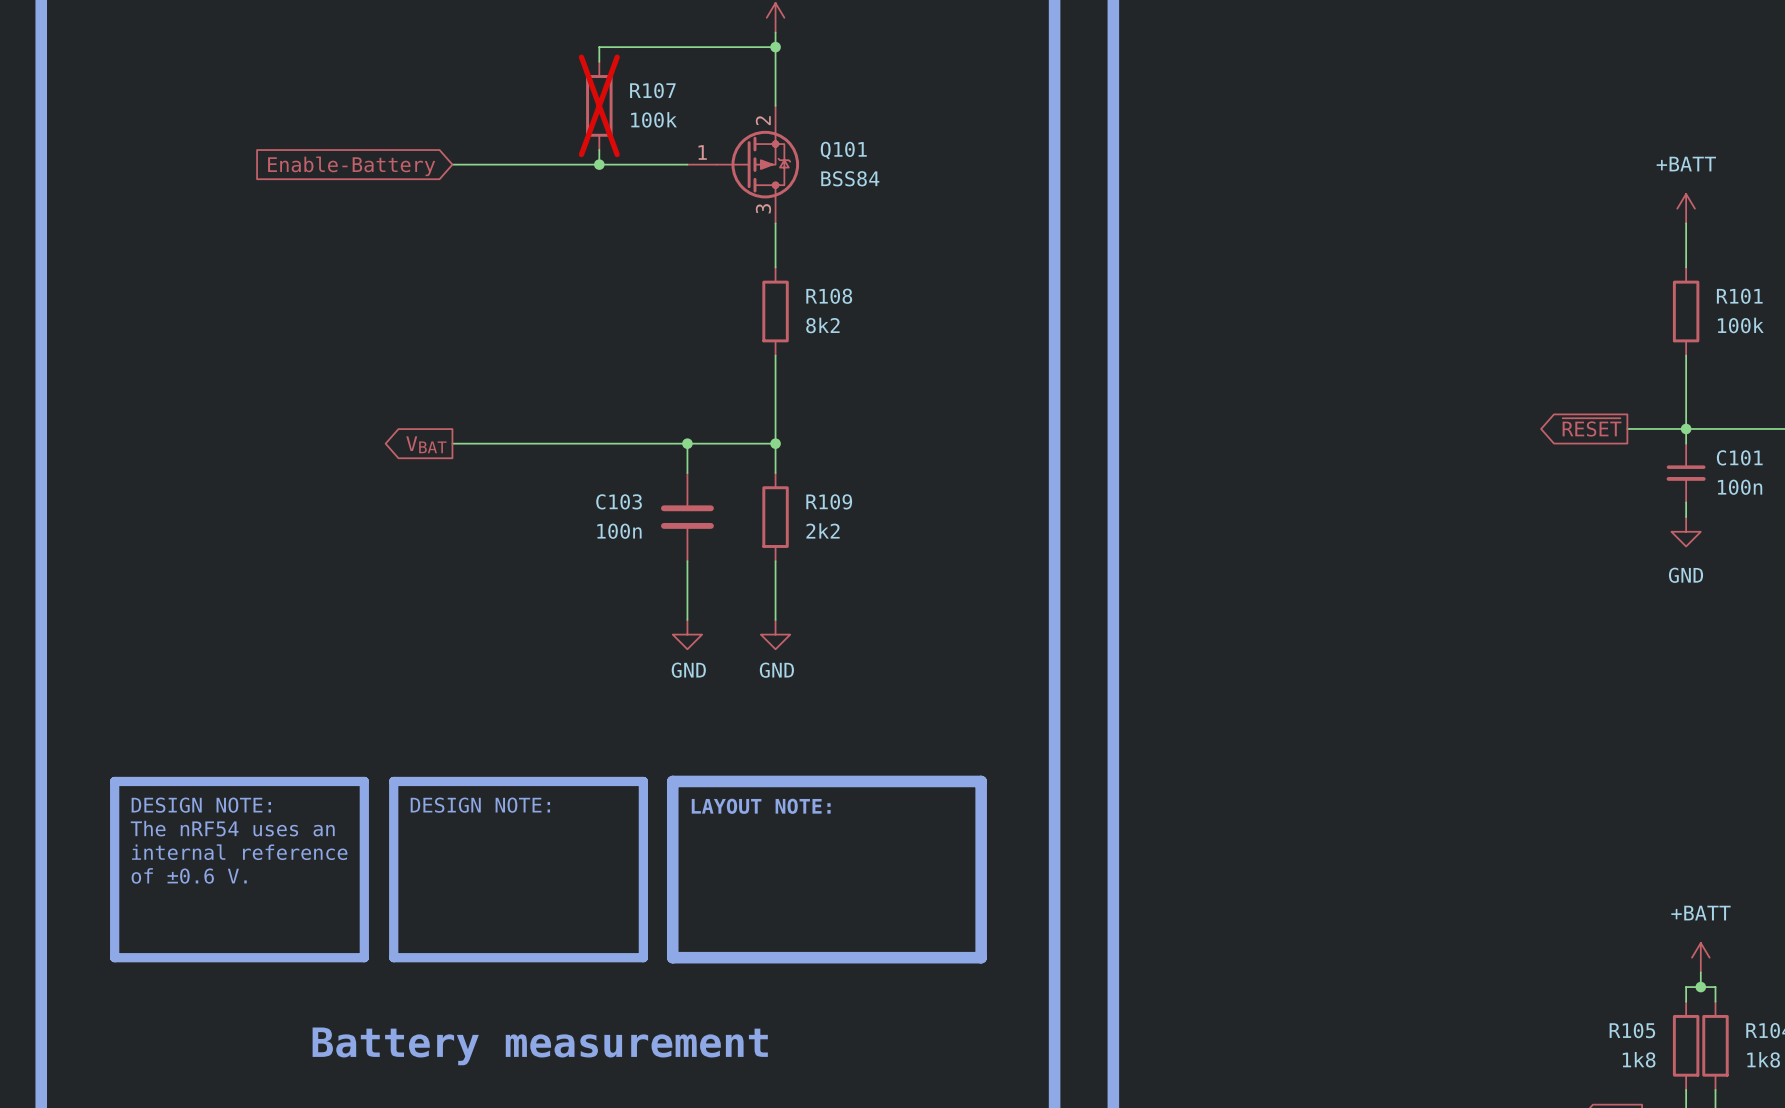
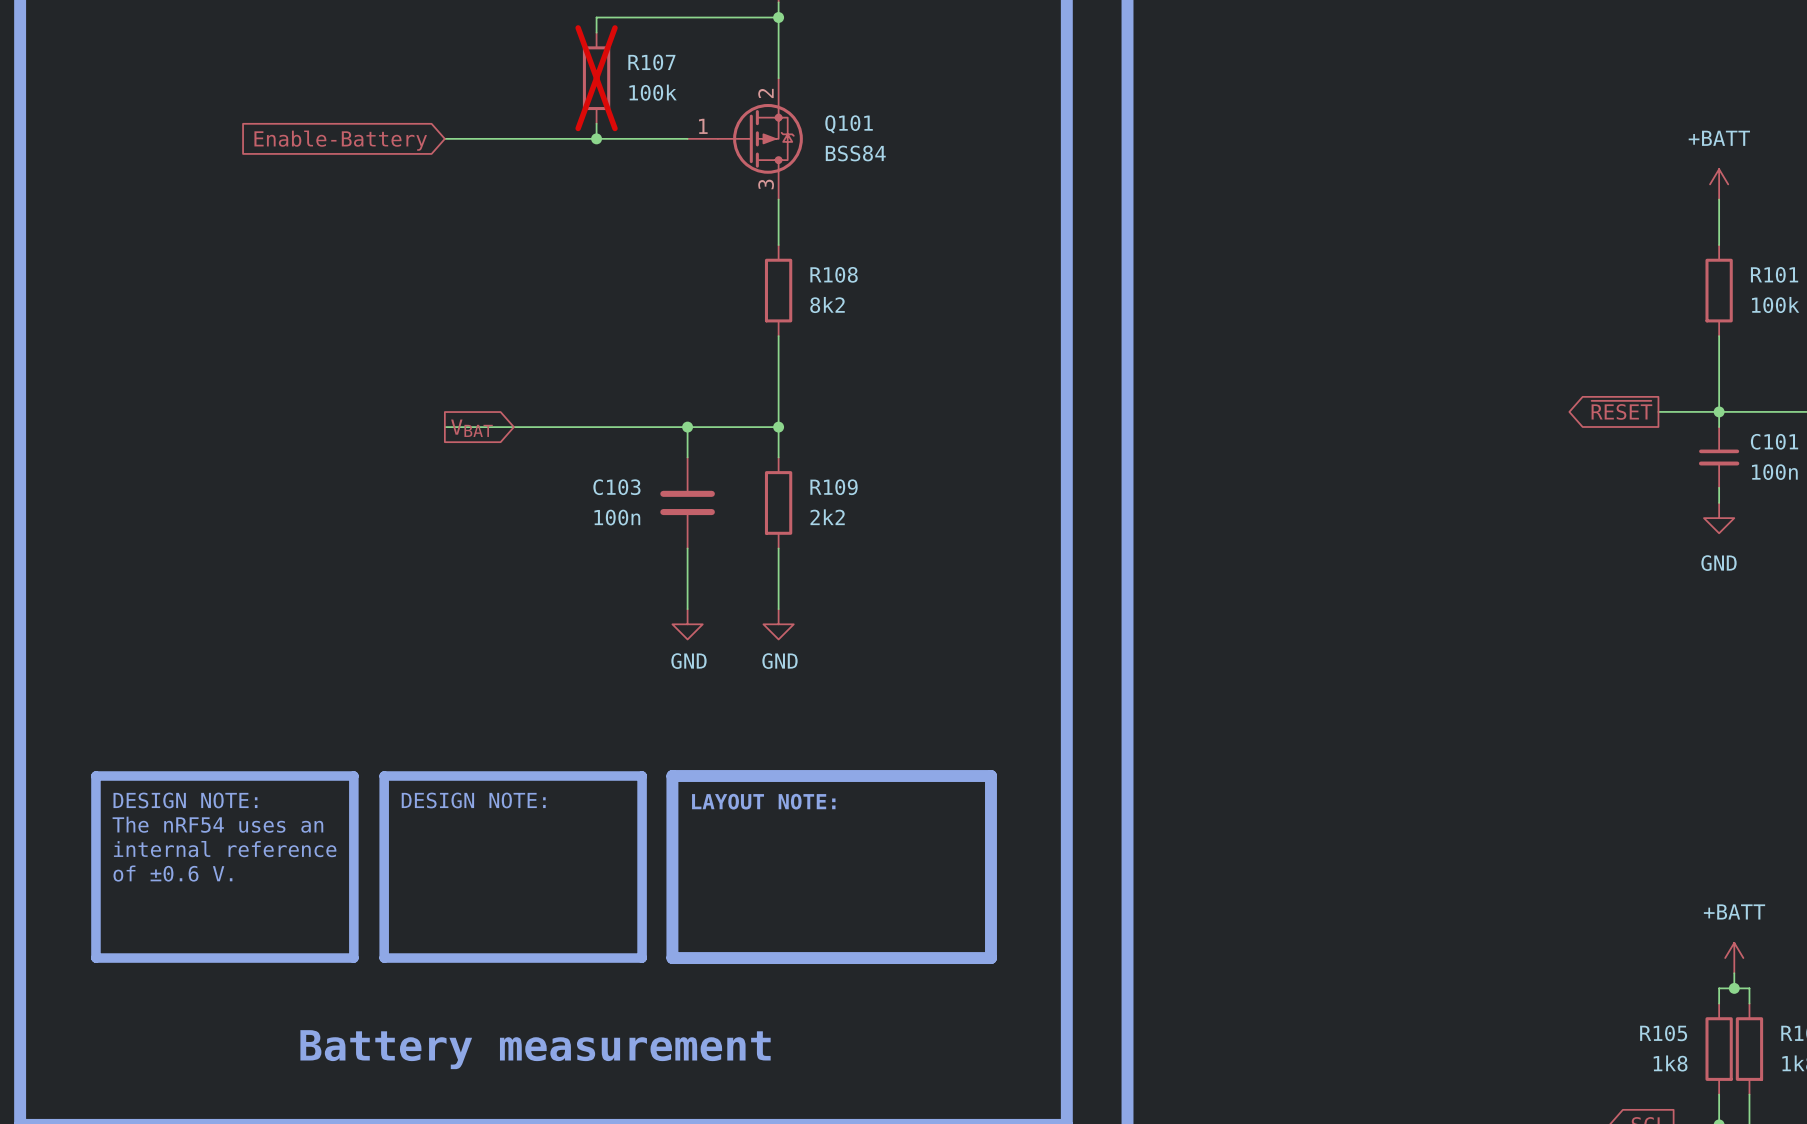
global label rotation: 0° (426, 444) -> 180° (471, 428)

